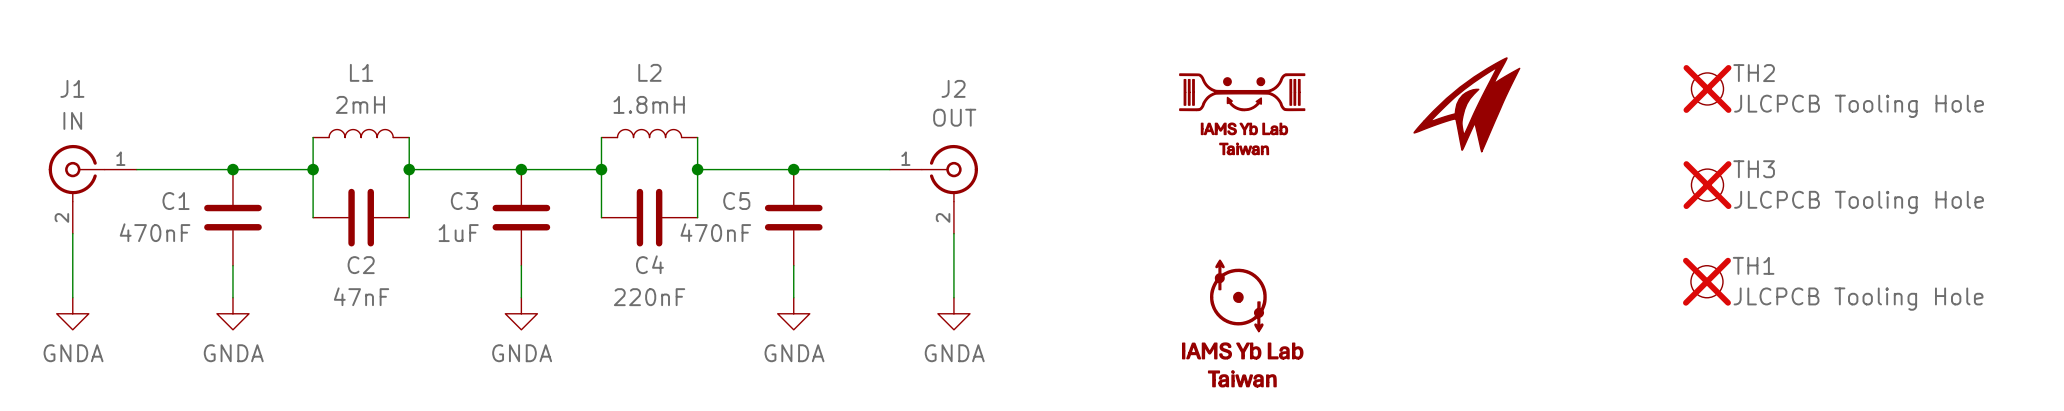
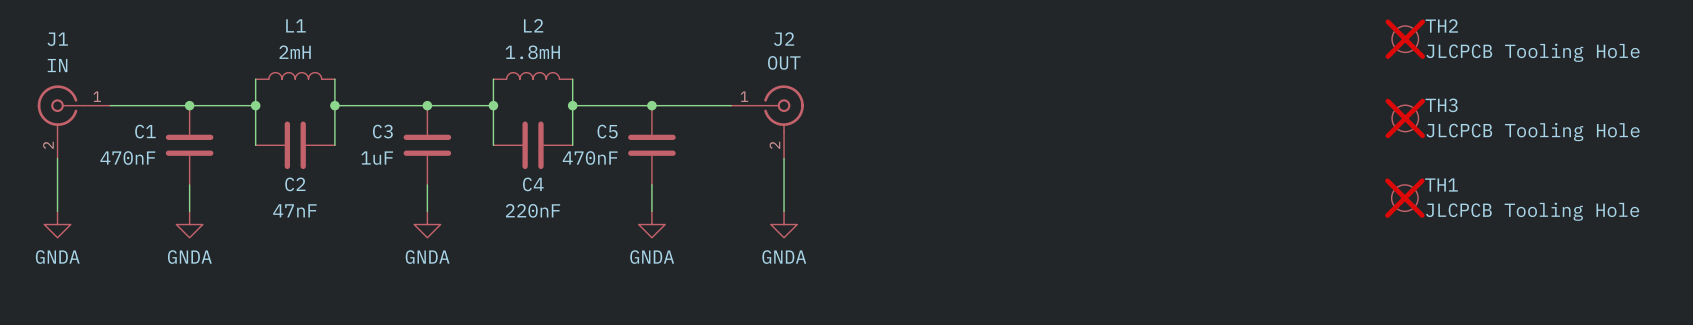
part: (1466, 104) -> none
part: (1242, 114) -> none
part: (1242, 323) -> none

